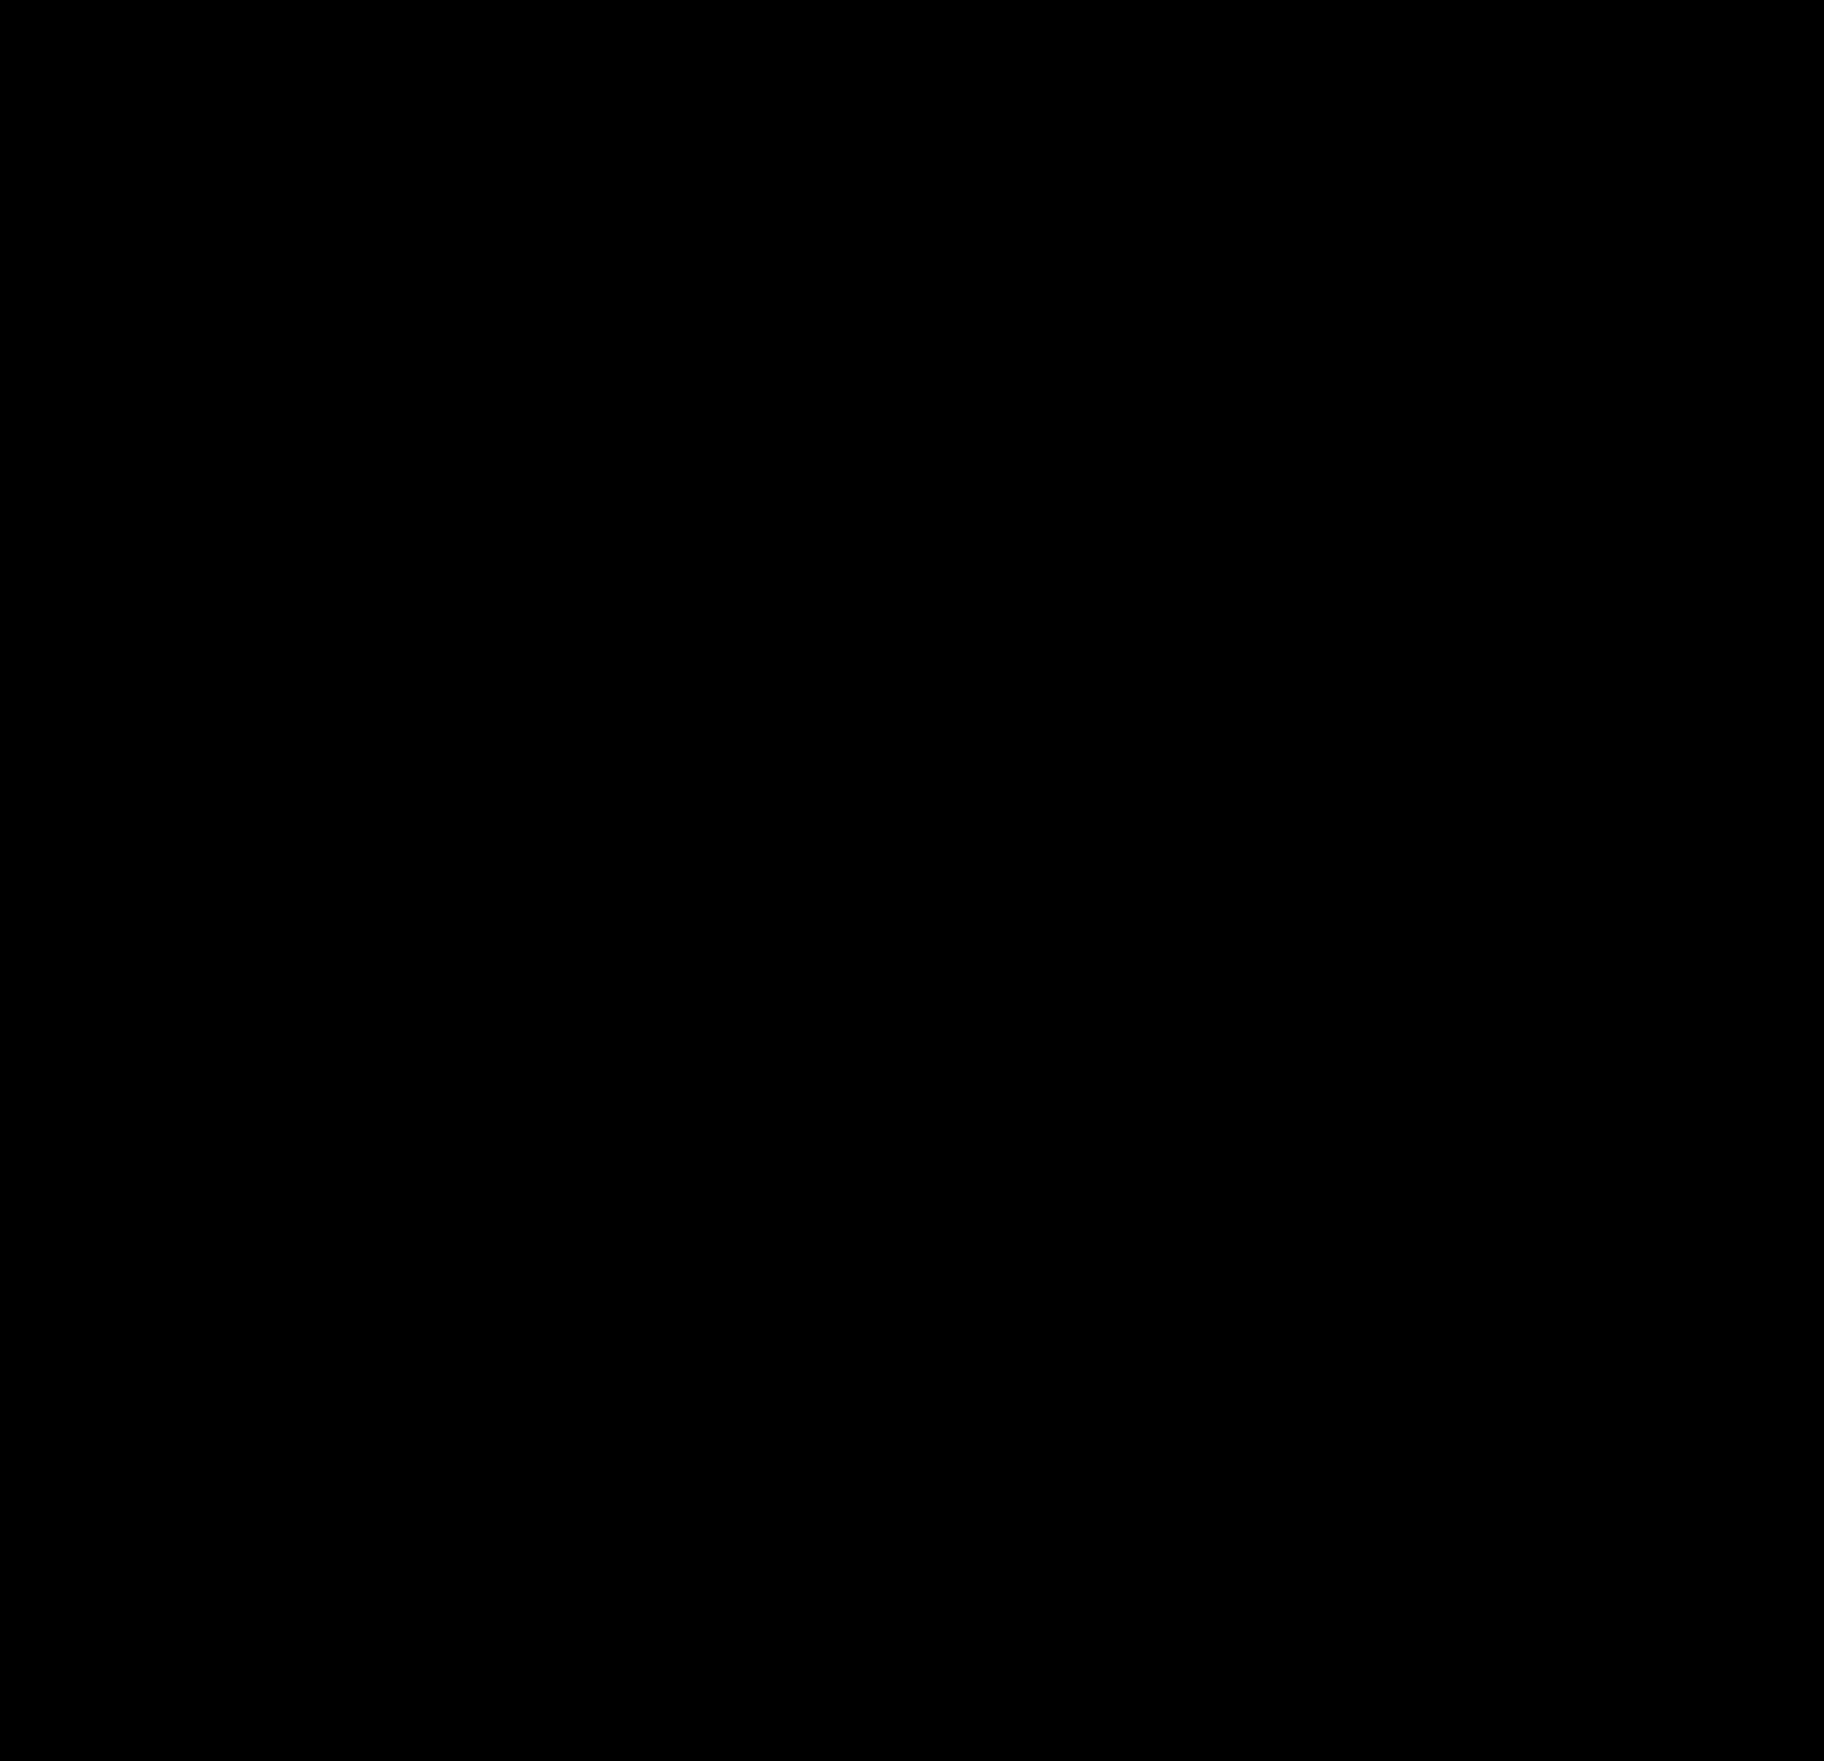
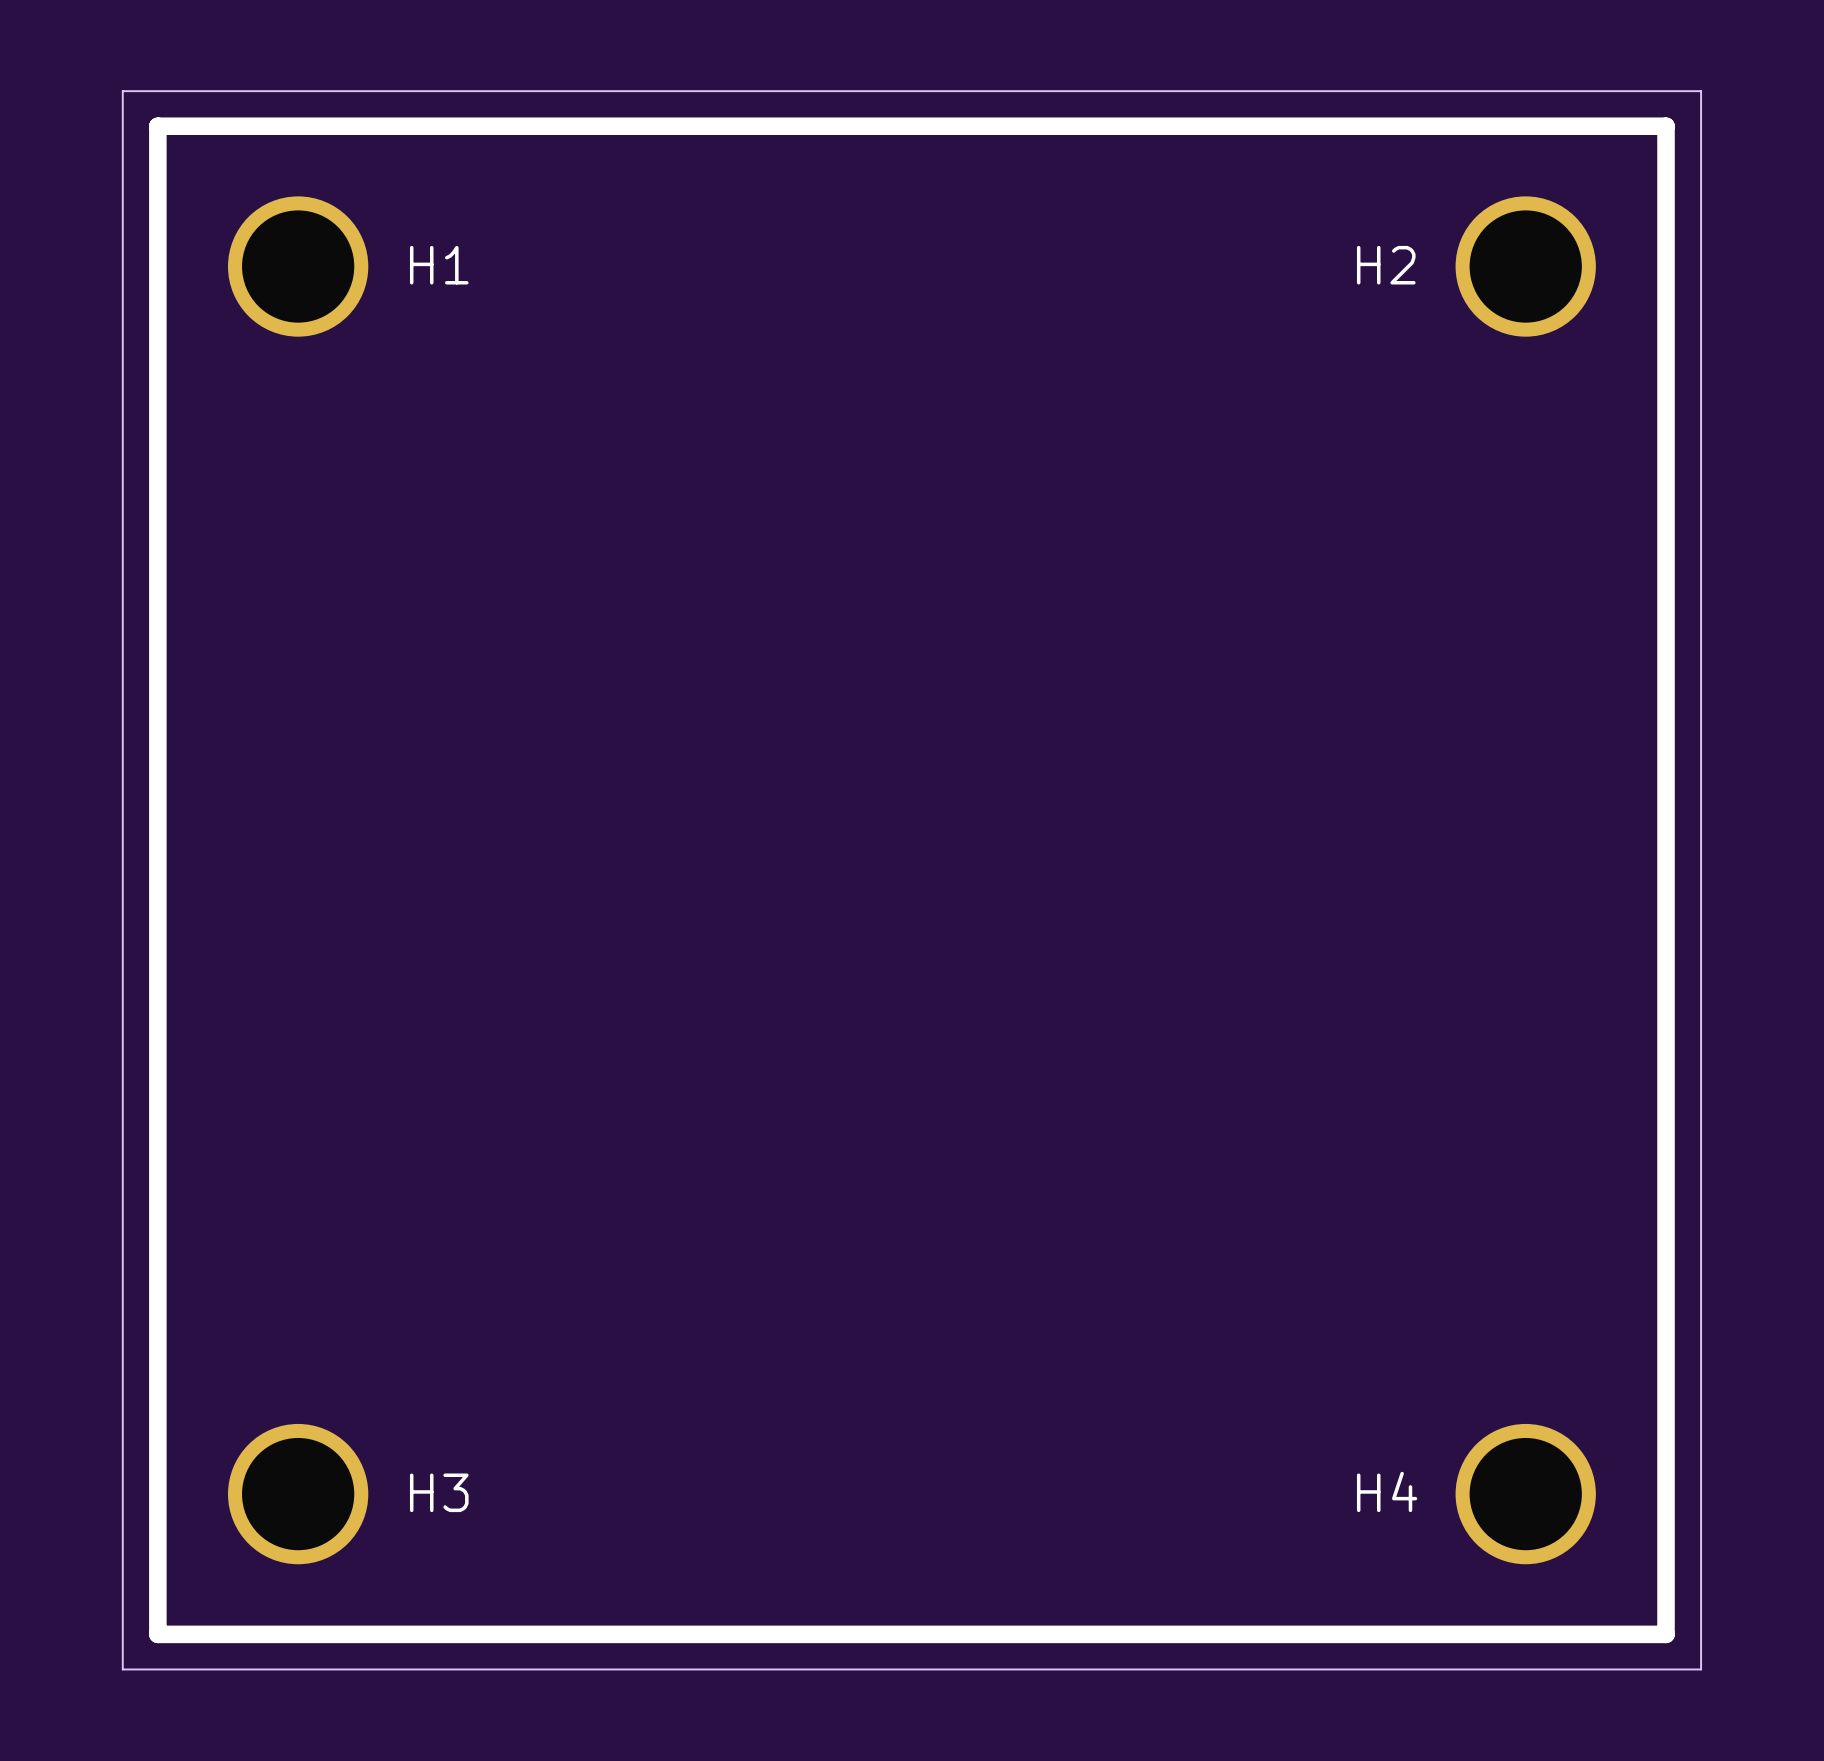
board edge: none -> (122, 91) (1701, 91) (1701, 1669) (122, 1669) (122, 91)
line: none -> (157, 126) (1666, 126) (1666, 1634) (157, 1634) (157, 126)
H1: none -> (298, 266)
H2: none -> (1525, 266)
H3: none -> (298, 1494)
H4: none -> (1525, 1494)

